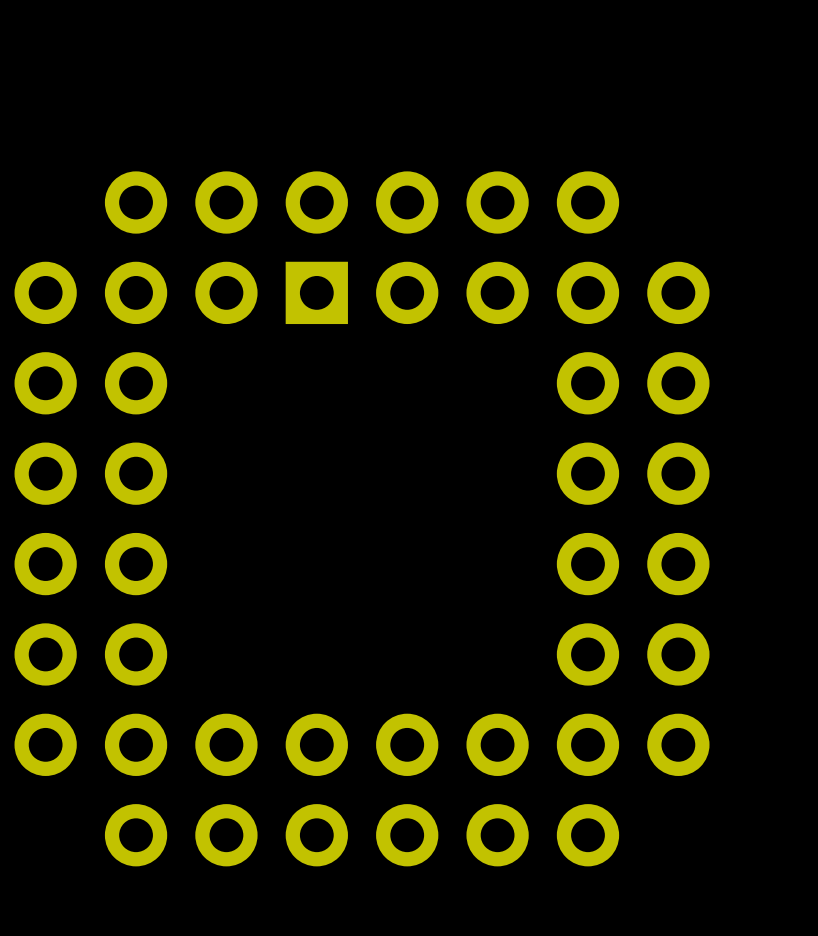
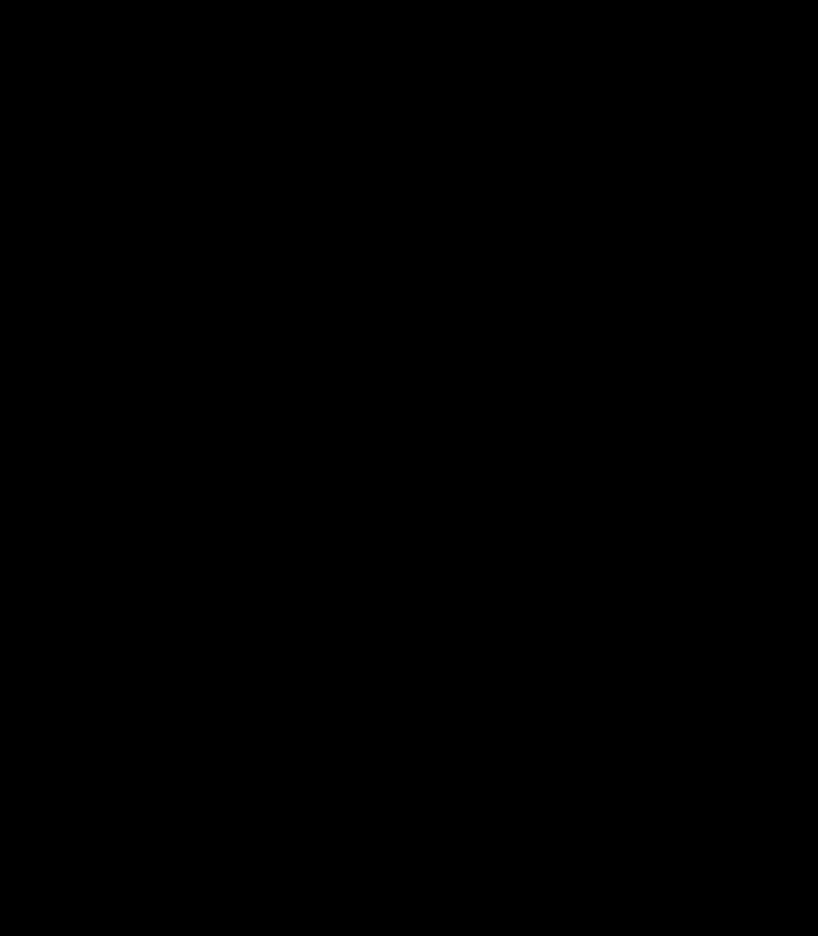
part: (362, 518) -> none

